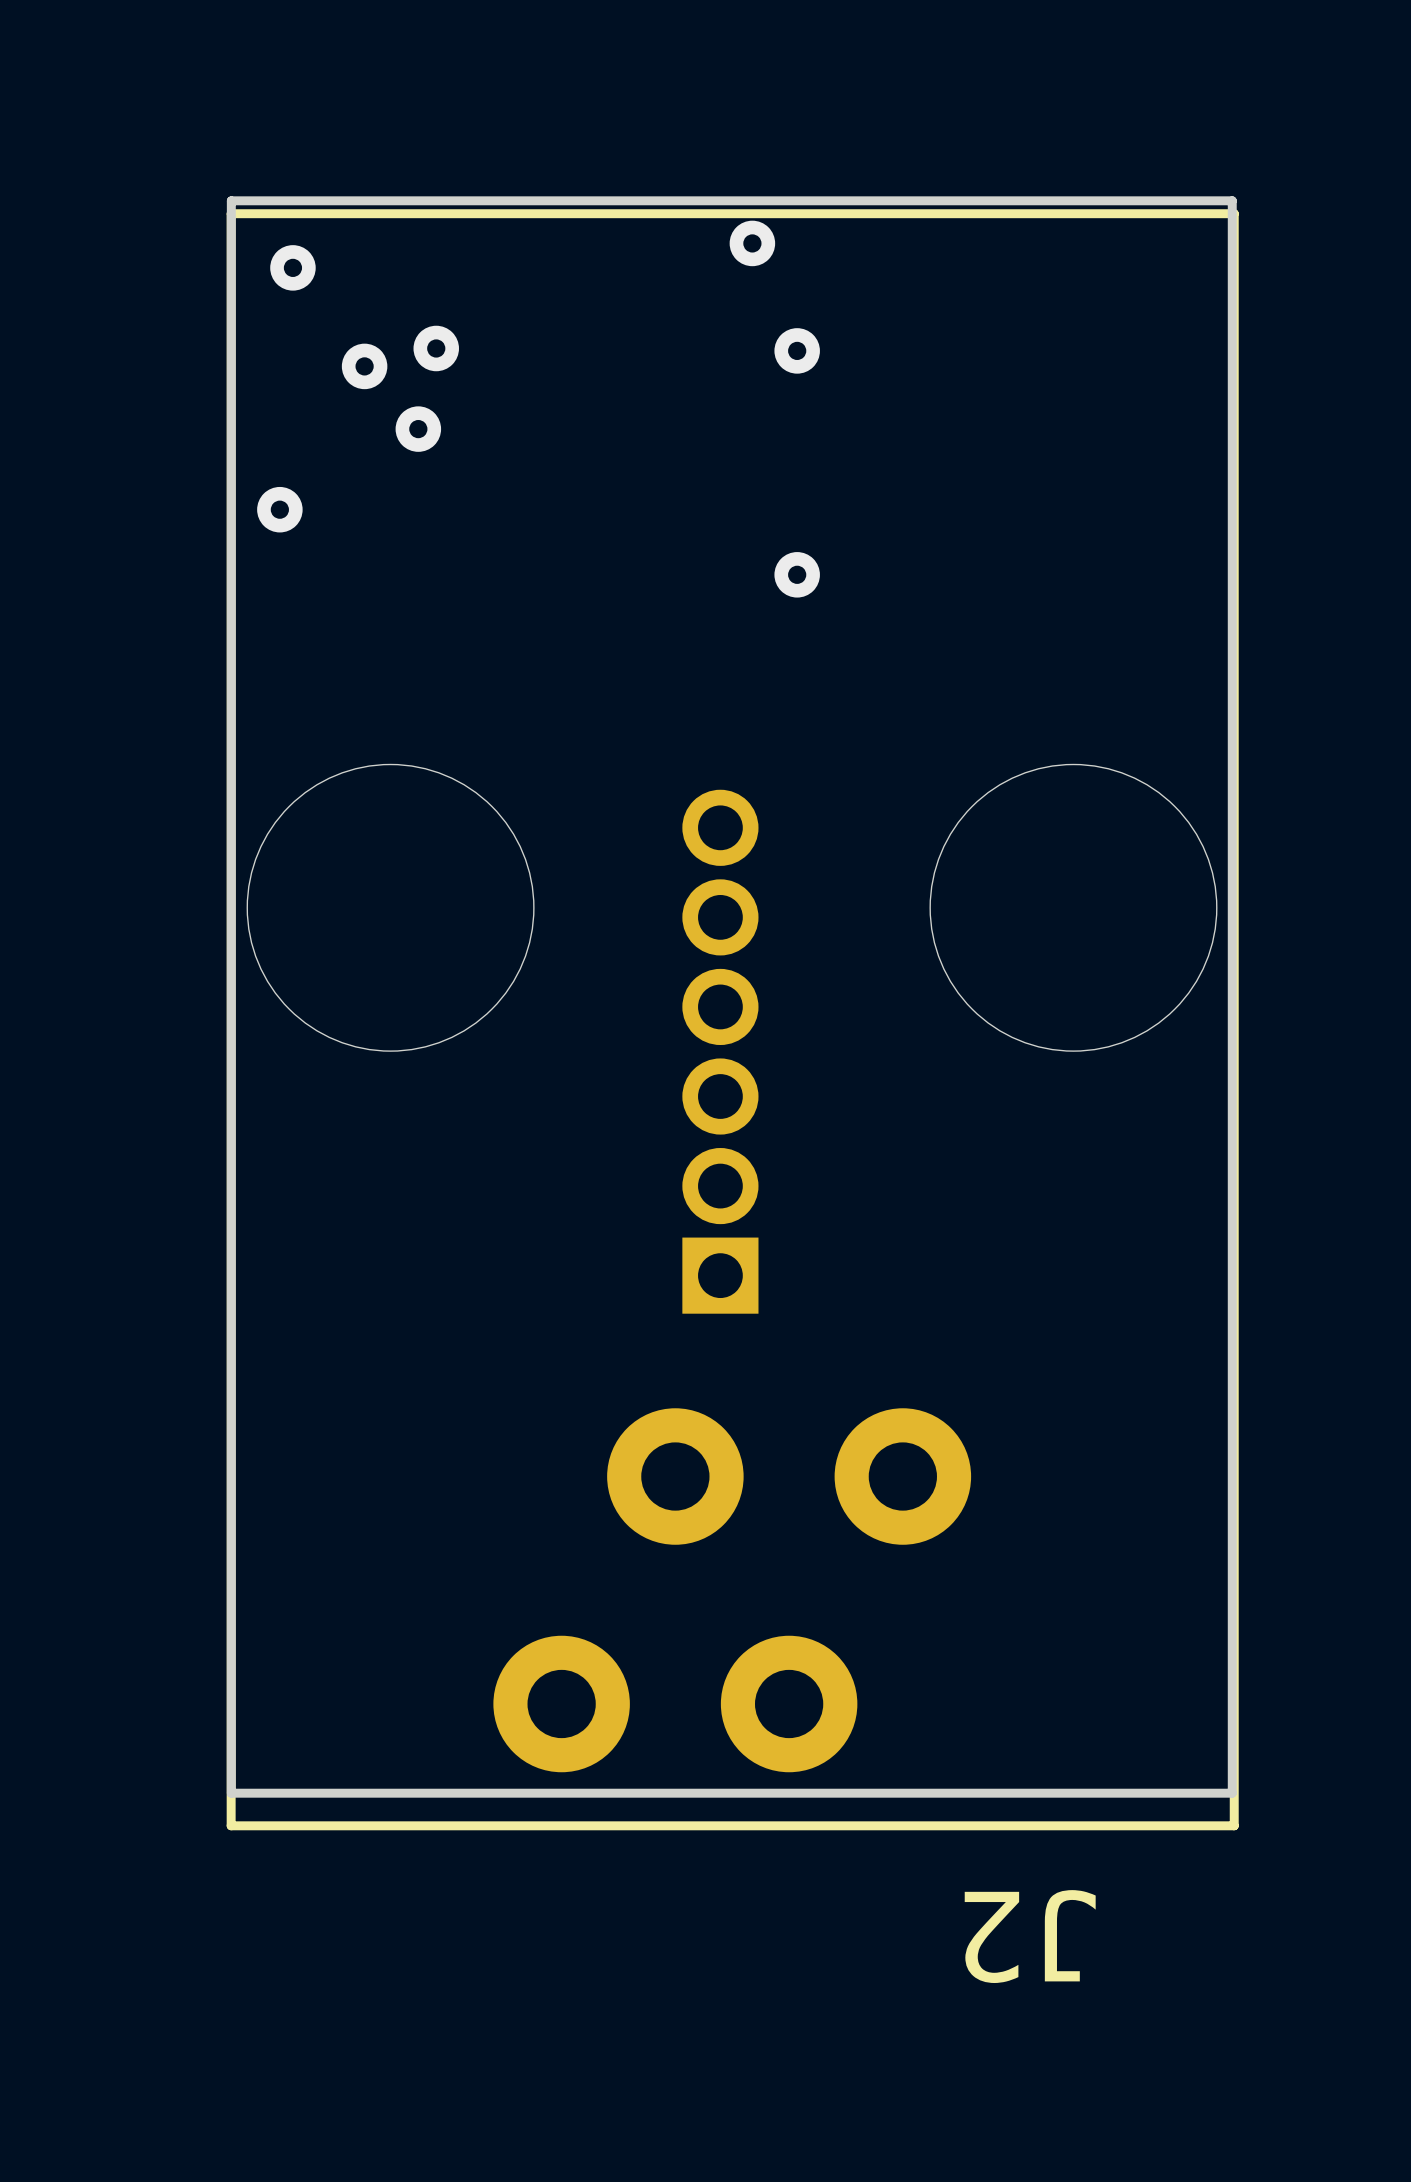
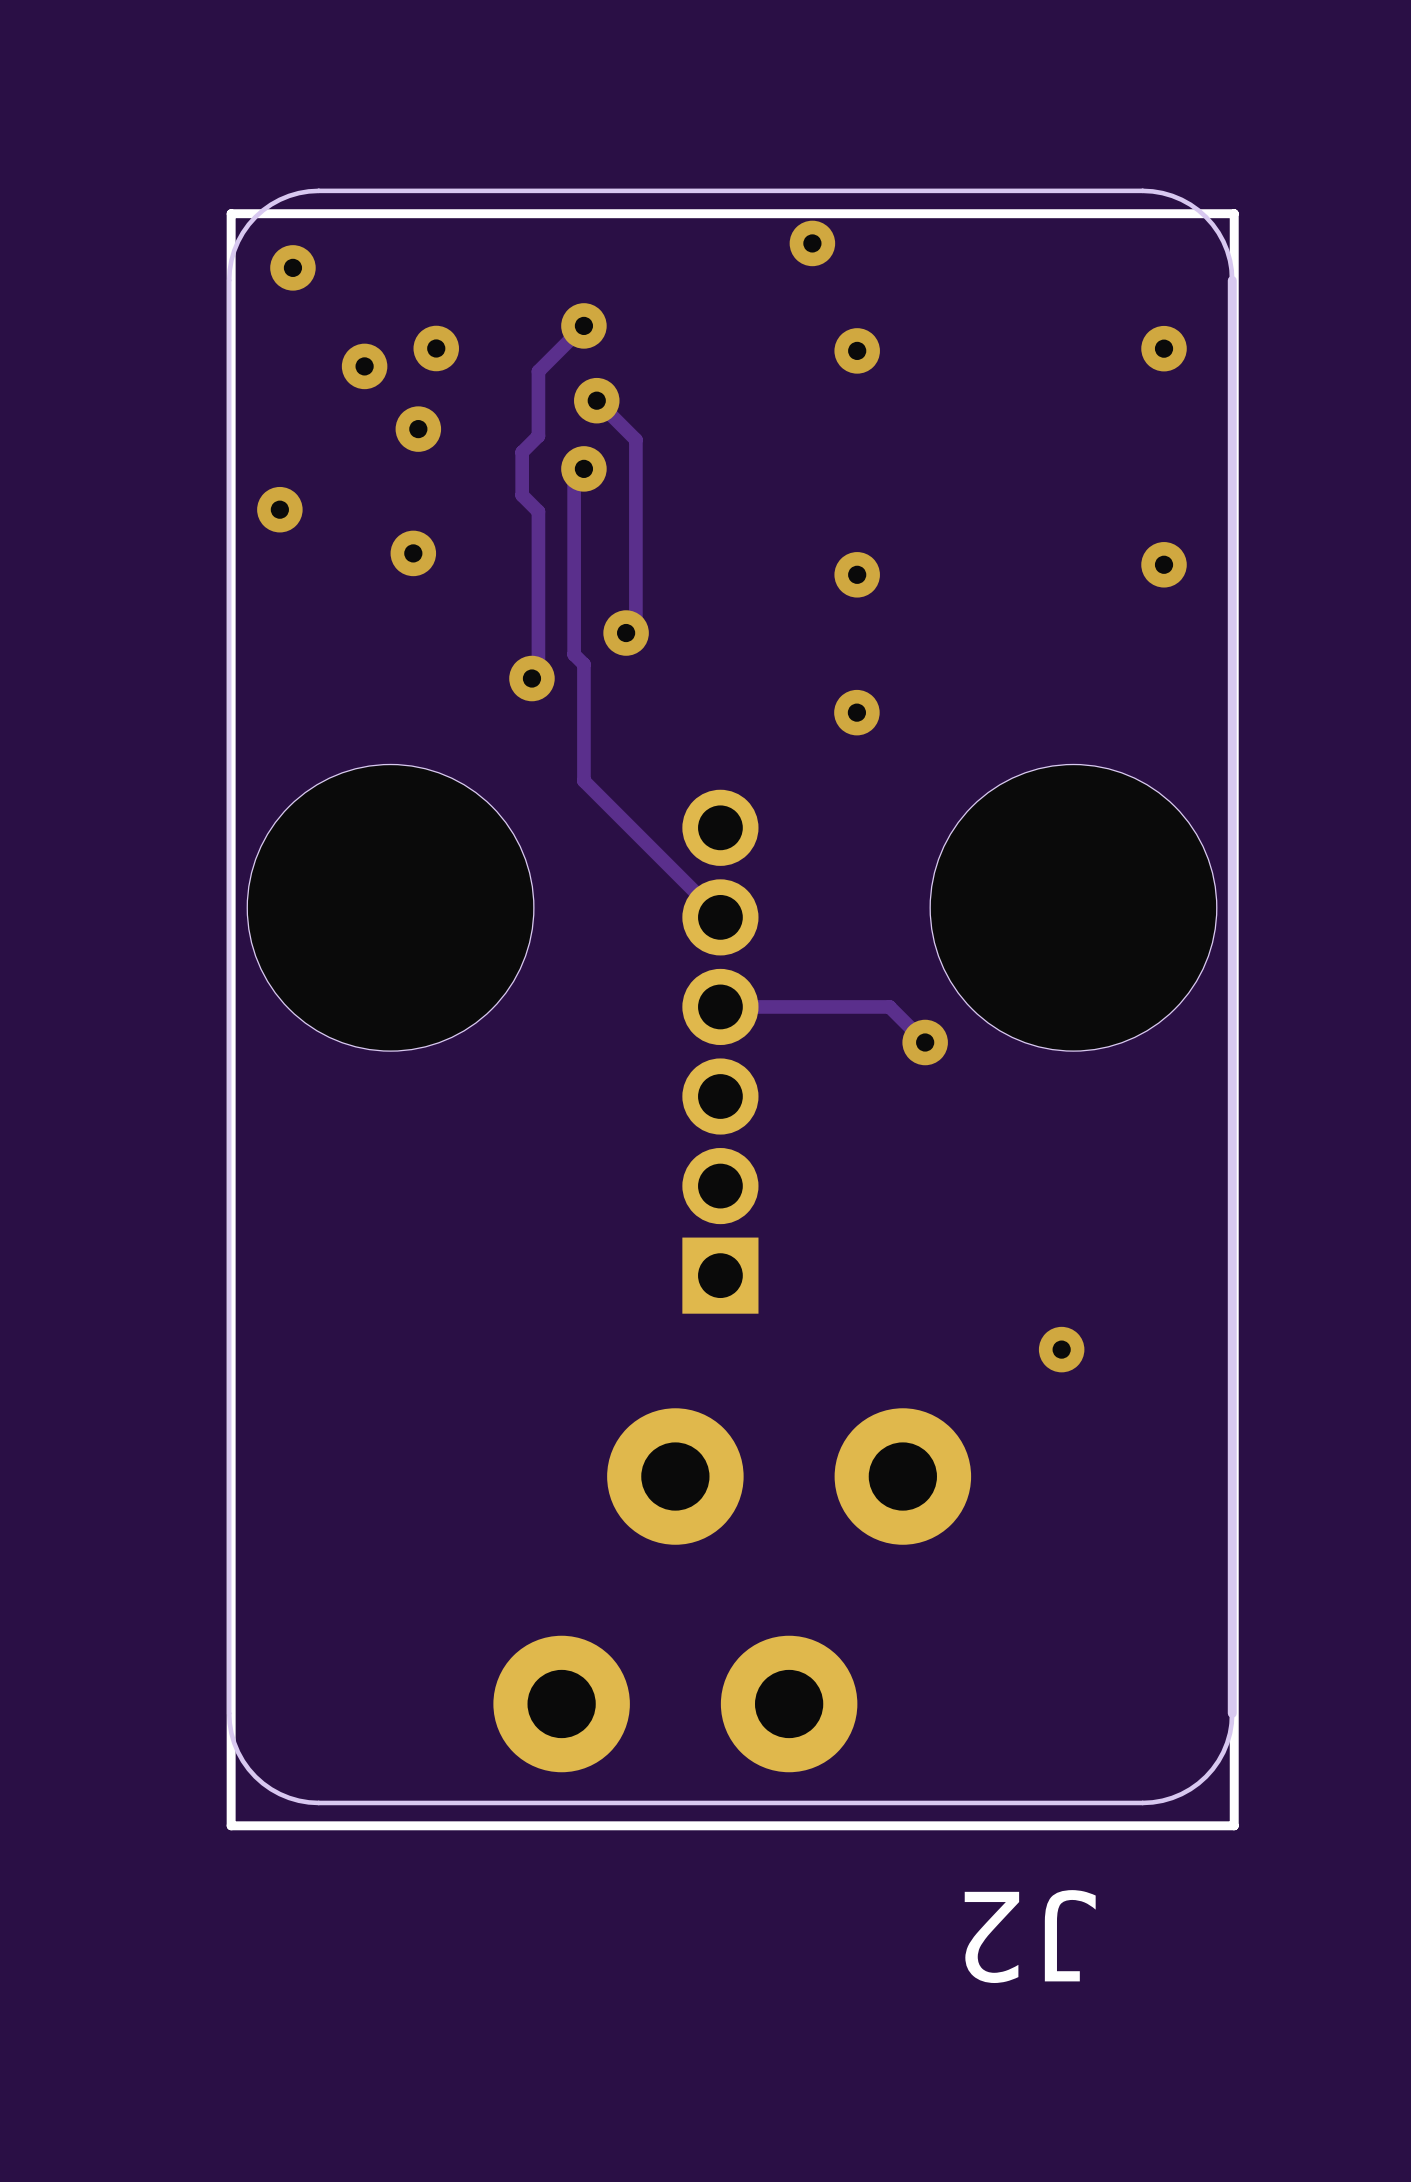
via: (752, 243) -> none
via: none -> (812, 243)
board edge: (1232, 280) (1232, 200) (231, 200) (231, 1793) (1232, 1793) (1232, 1713) -> (1232, 280) (1230, 260) (1223, 241) (1206, 217) (1181, 199) (1162, 193) (1142, 190) (308, 191) (279, 199) (262, 210) (248, 224) (234, 250) (229, 280) (229, 1713) (231, 1733) (242, 1761) (255, 1776) (279, 1794) (298, 1800) (318, 1802) (1142, 1802) (1172, 1797) (1190, 1789) (1206, 1776) (1223, 1752) (1230, 1733) (1232, 1713)
track: none -> (583, 325) (538, 371) (538, 436) (522, 452) (522, 495) (538, 511) (538, 672) (531, 678)
via: none -> (583, 325)
via: none -> (1164, 348)
via: (797, 350) -> none
via: none -> (857, 350)
track: none -> (596, 400) (635, 439) (635, 623) (626, 633)
via: none -> (596, 400)
track: none -> (583, 468) (574, 478) (574, 654) (583, 664) (583, 780) (720, 917)
via: none -> (583, 468)
via: none -> (413, 553)
via: none -> (1164, 564)
via position: (797, 574) -> (857, 574)
via: none -> (626, 633)
via: none -> (531, 678)
via: none -> (856, 712)
track: none -> (720, 1006) (889, 1006) (925, 1042)
via: none -> (925, 1042)
via: none -> (1061, 1349)

